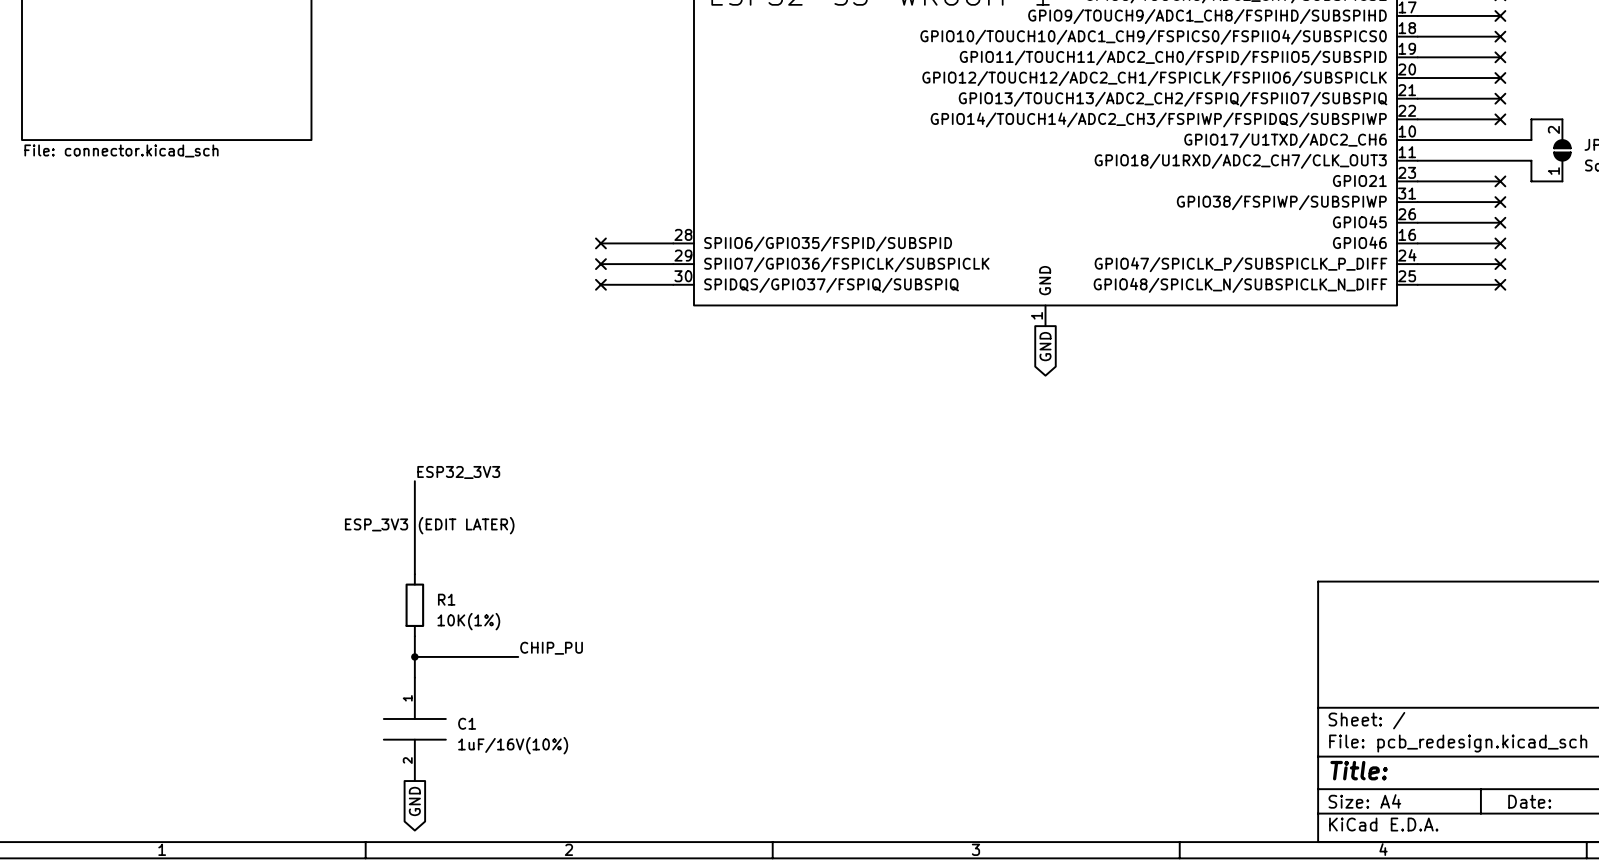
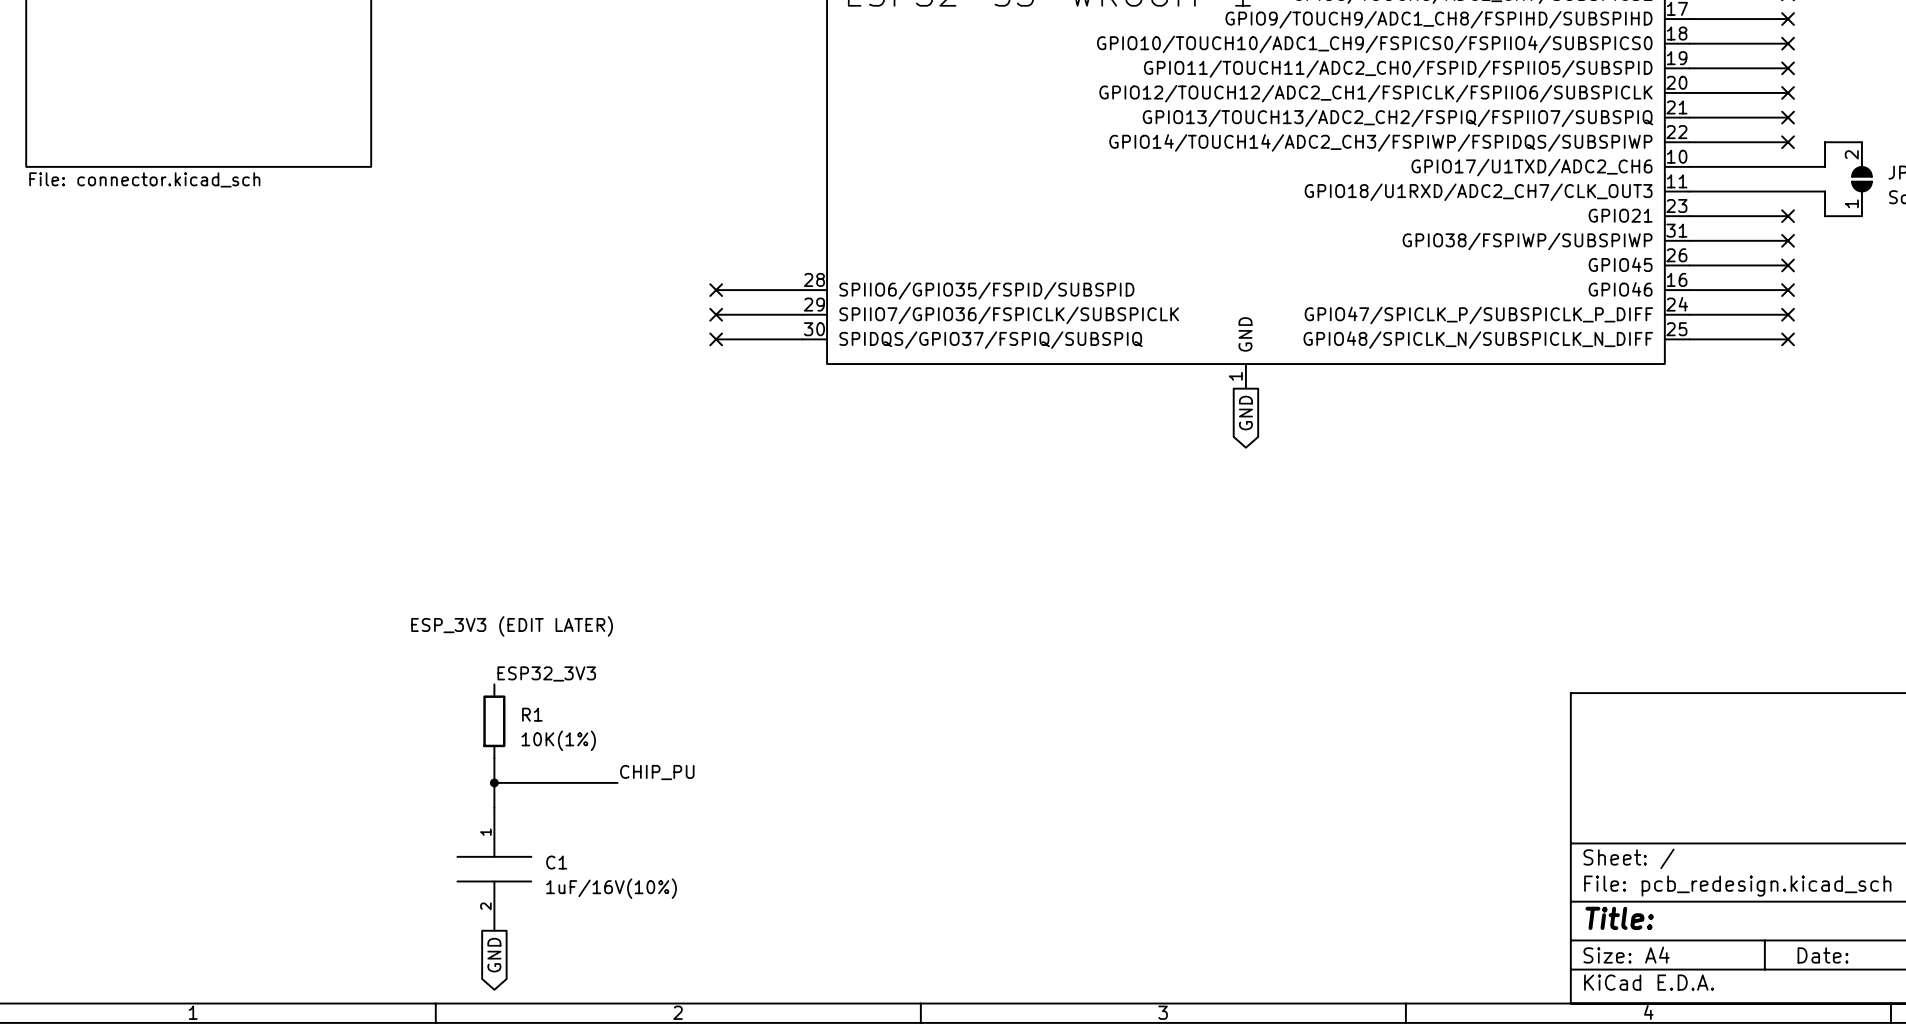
label position: ESP32_3V3 (458, 472) -> ESP32_3V3 (546, 673)
wire: (414, 481) (414, 574) -> none

